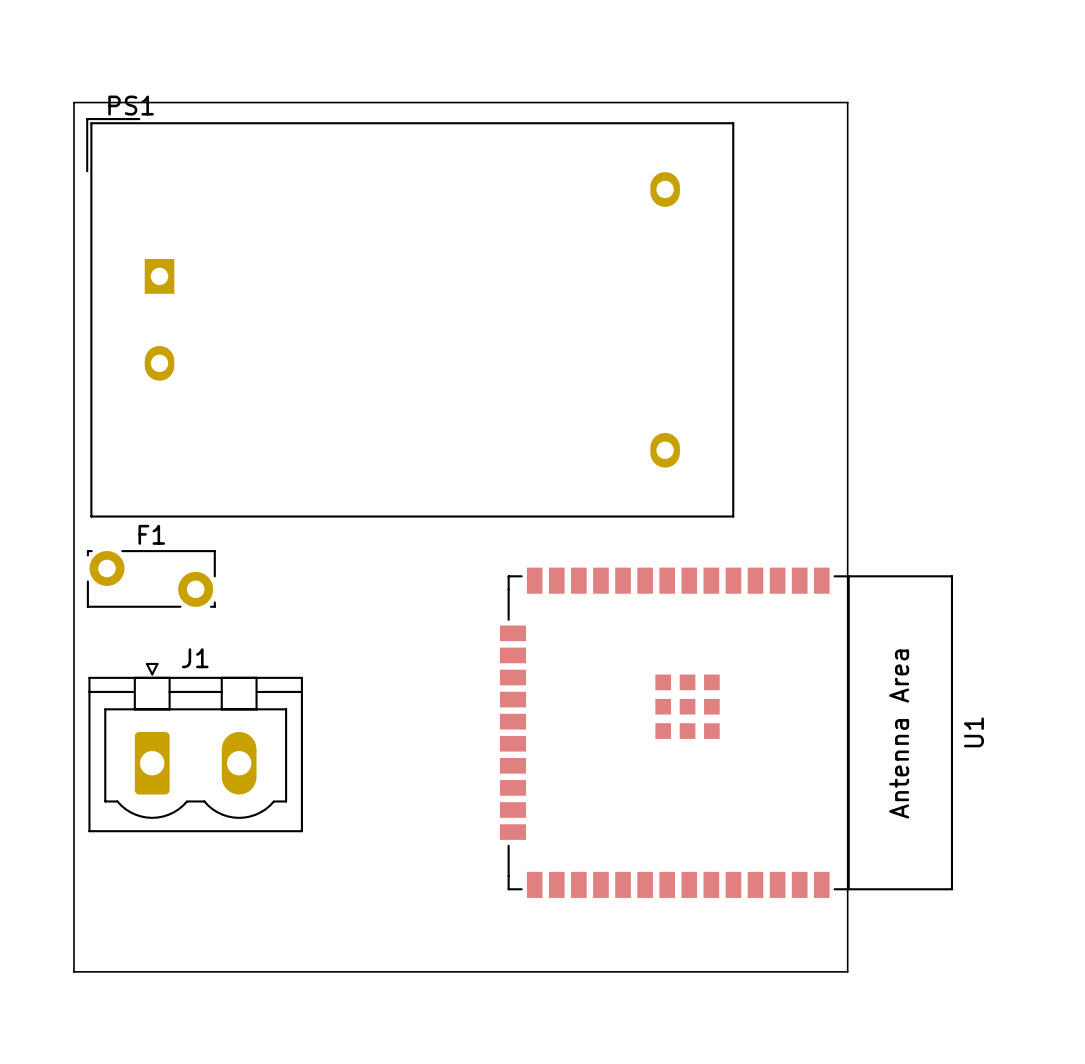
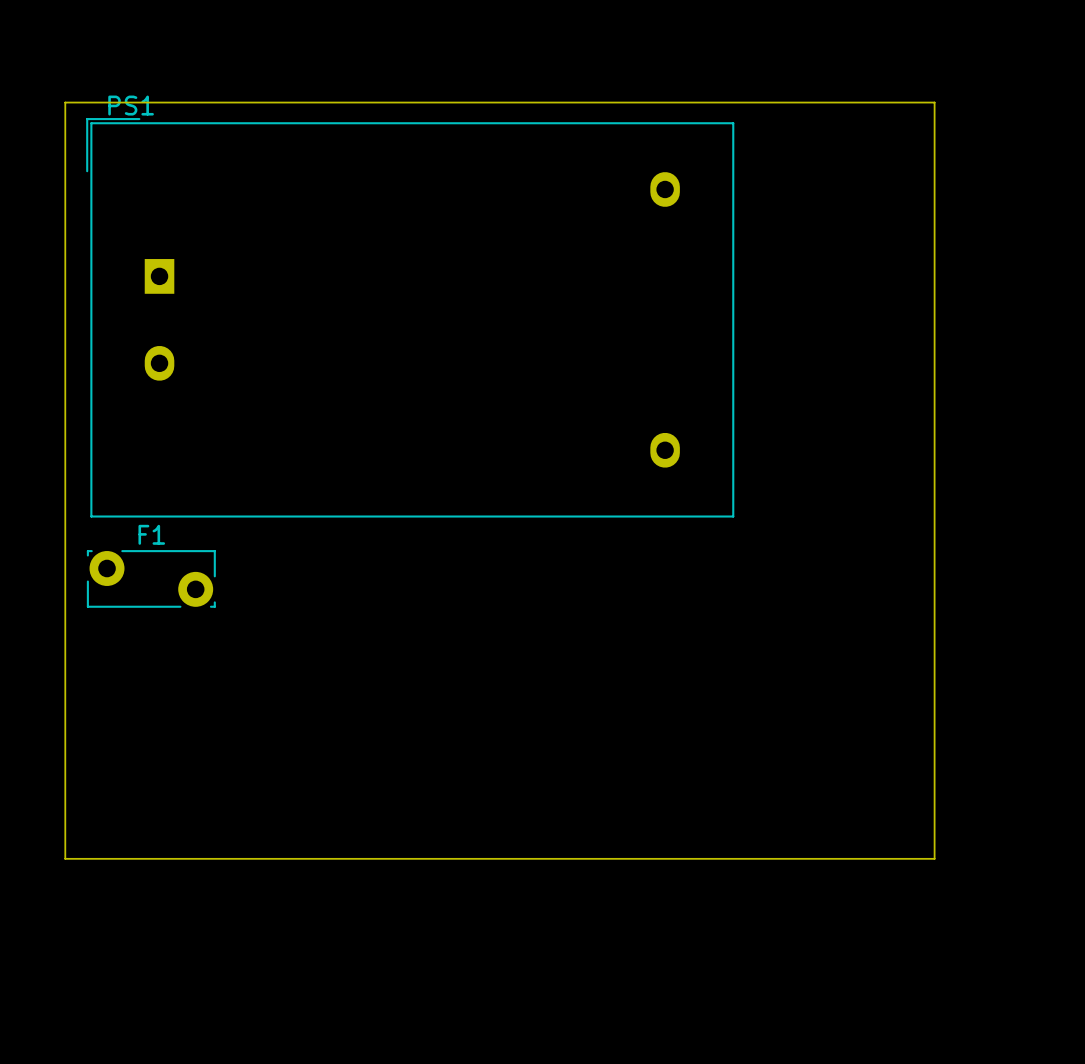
board edge: (73, 102) (73, 971) (847, 971) (847, 102) -> (73, 102) (65, 102) (65, 858) (934, 858) (934, 102) (847, 102)
U1: (726, 732) -> none
J1: (195, 747) -> none

